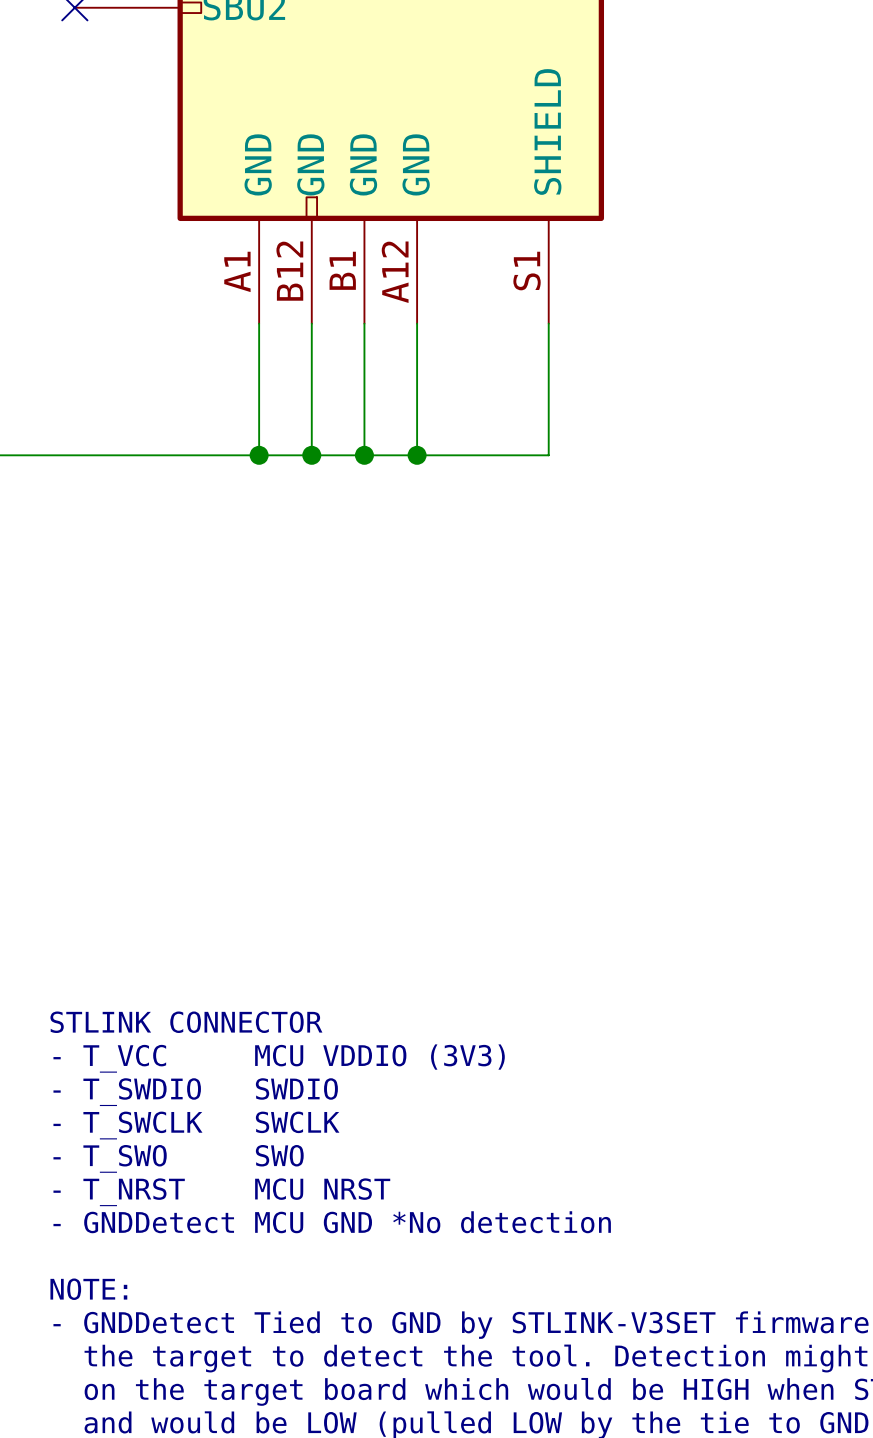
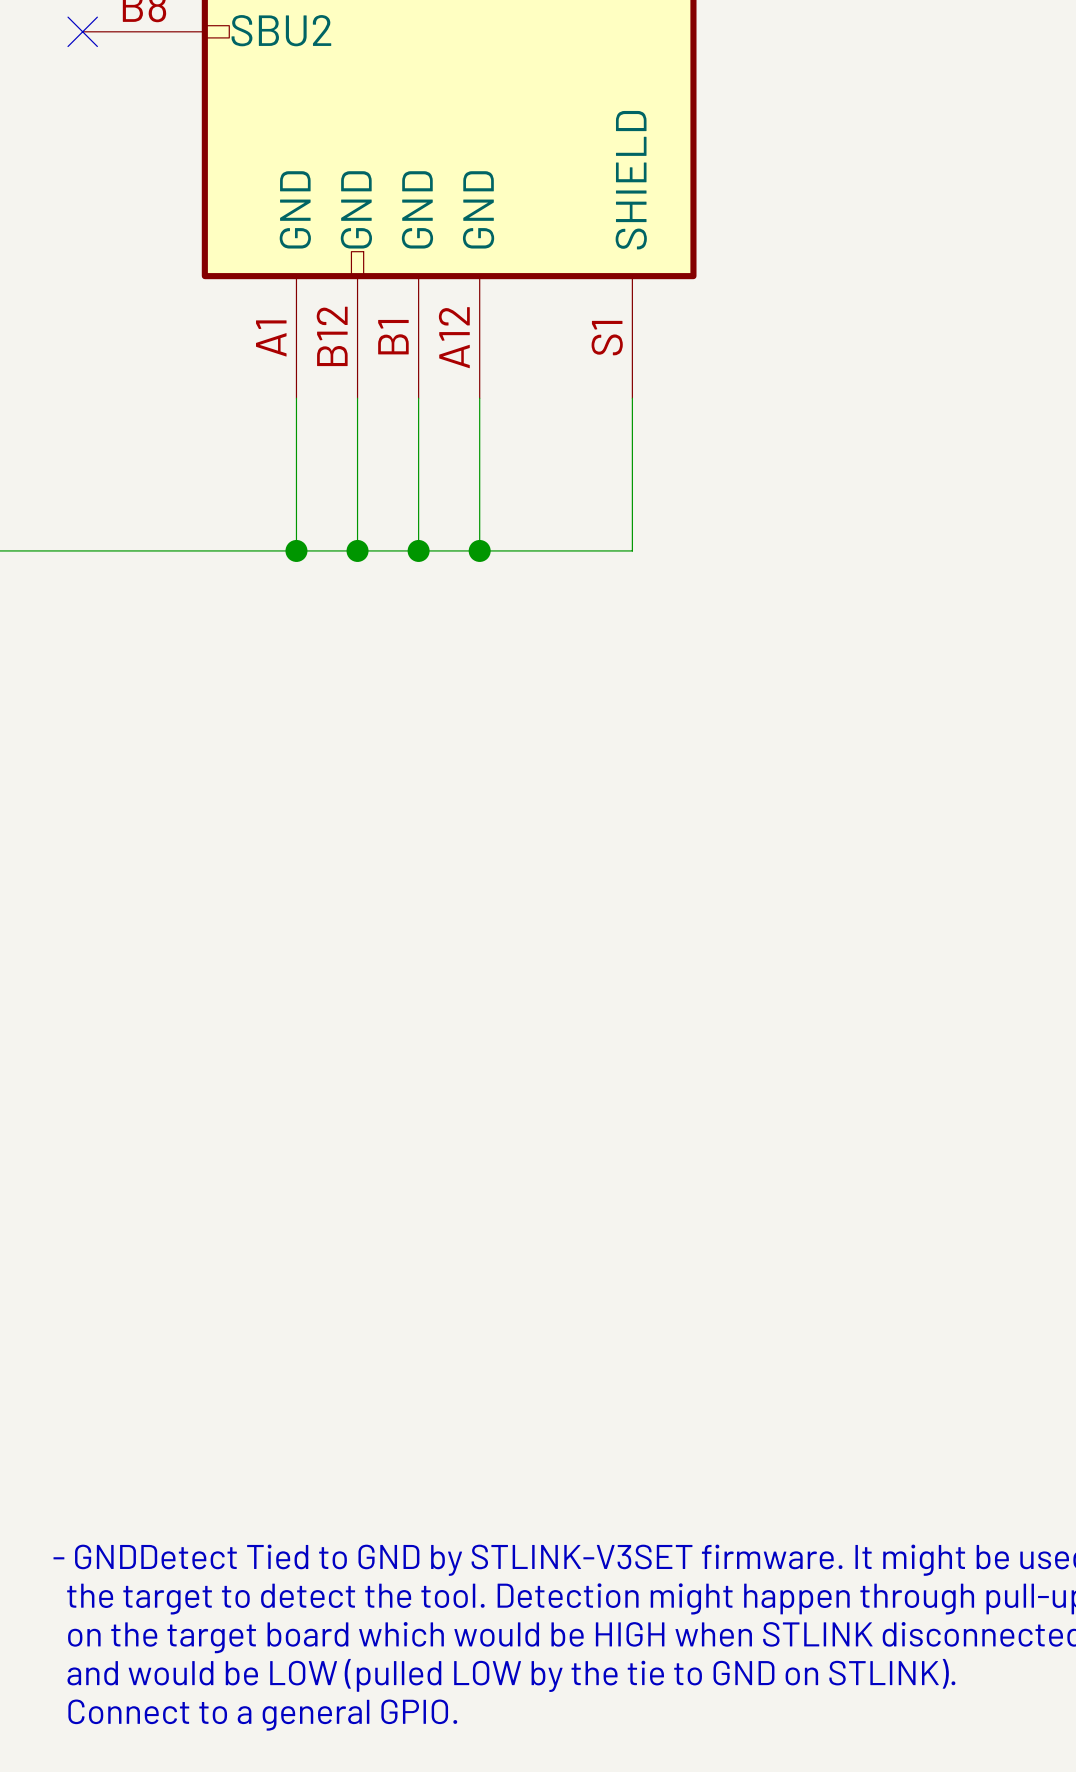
text: STLINK CONNECTOR (186, 1022) -> none
text: - T_VCC MCU VDDIO (3V3) (279, 1058) -> none
text: - T_SWDIO SWDIO (195, 1092) -> none
text: - T_SWCLK SWCLK (196, 1125) -> none
text: - T_SWO SWO (178, 1158) -> none
text: - T_NRST MCU NRST (221, 1192) -> none
text: - GNDDetect MCU GND *No detection (332, 1222) -> none
text: NOTE: (88, 1289) -> none

